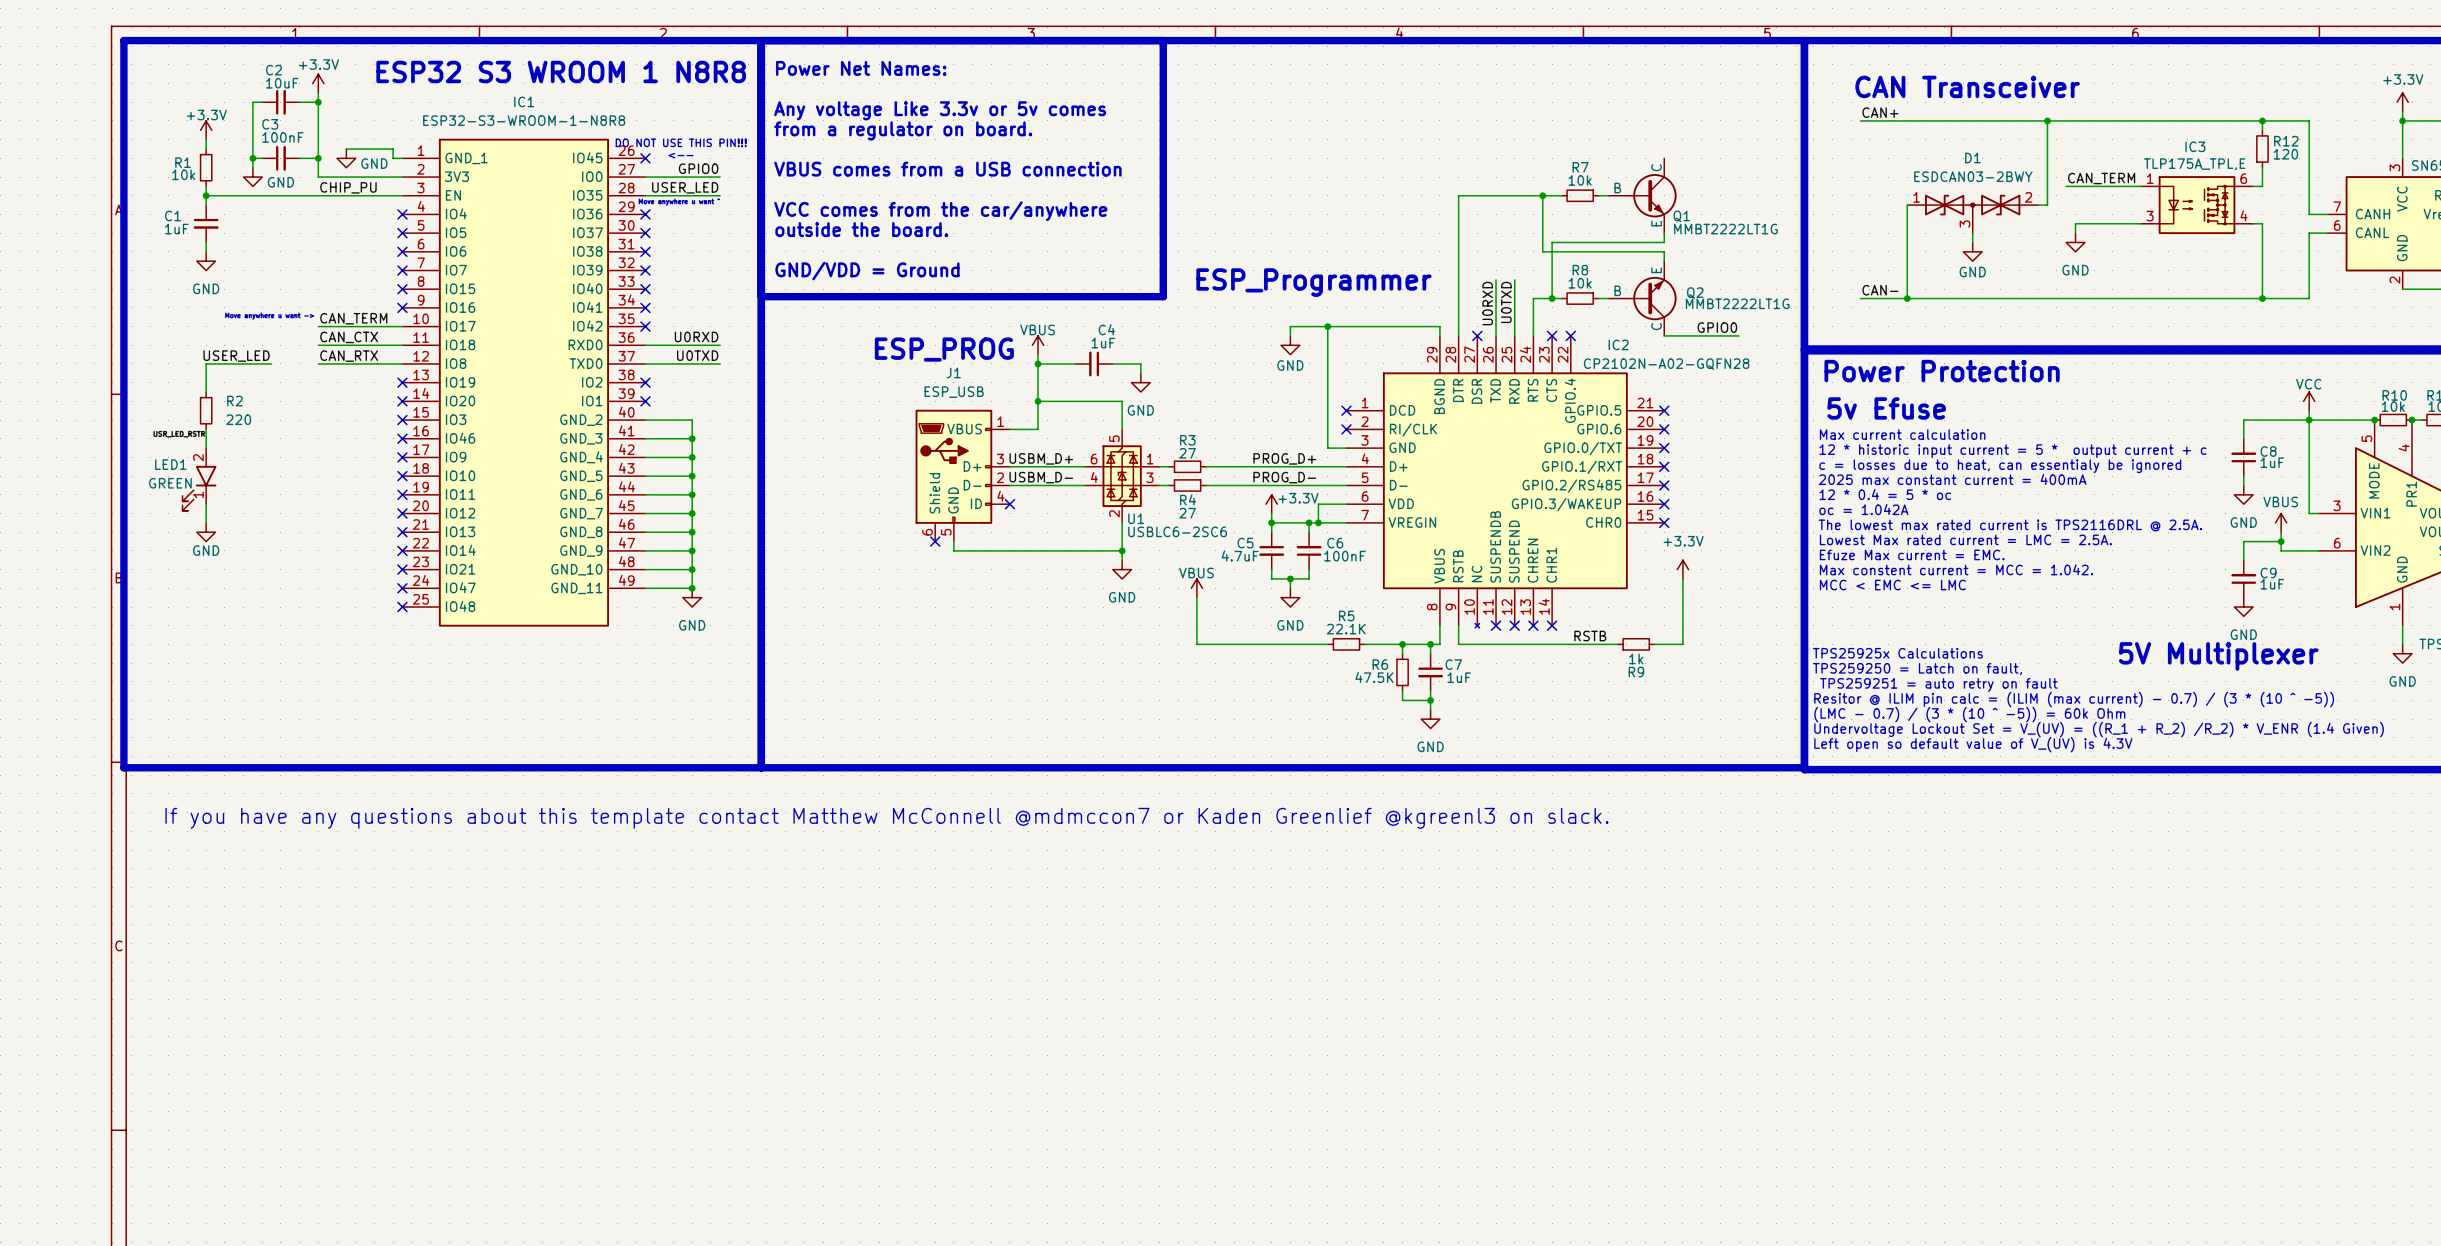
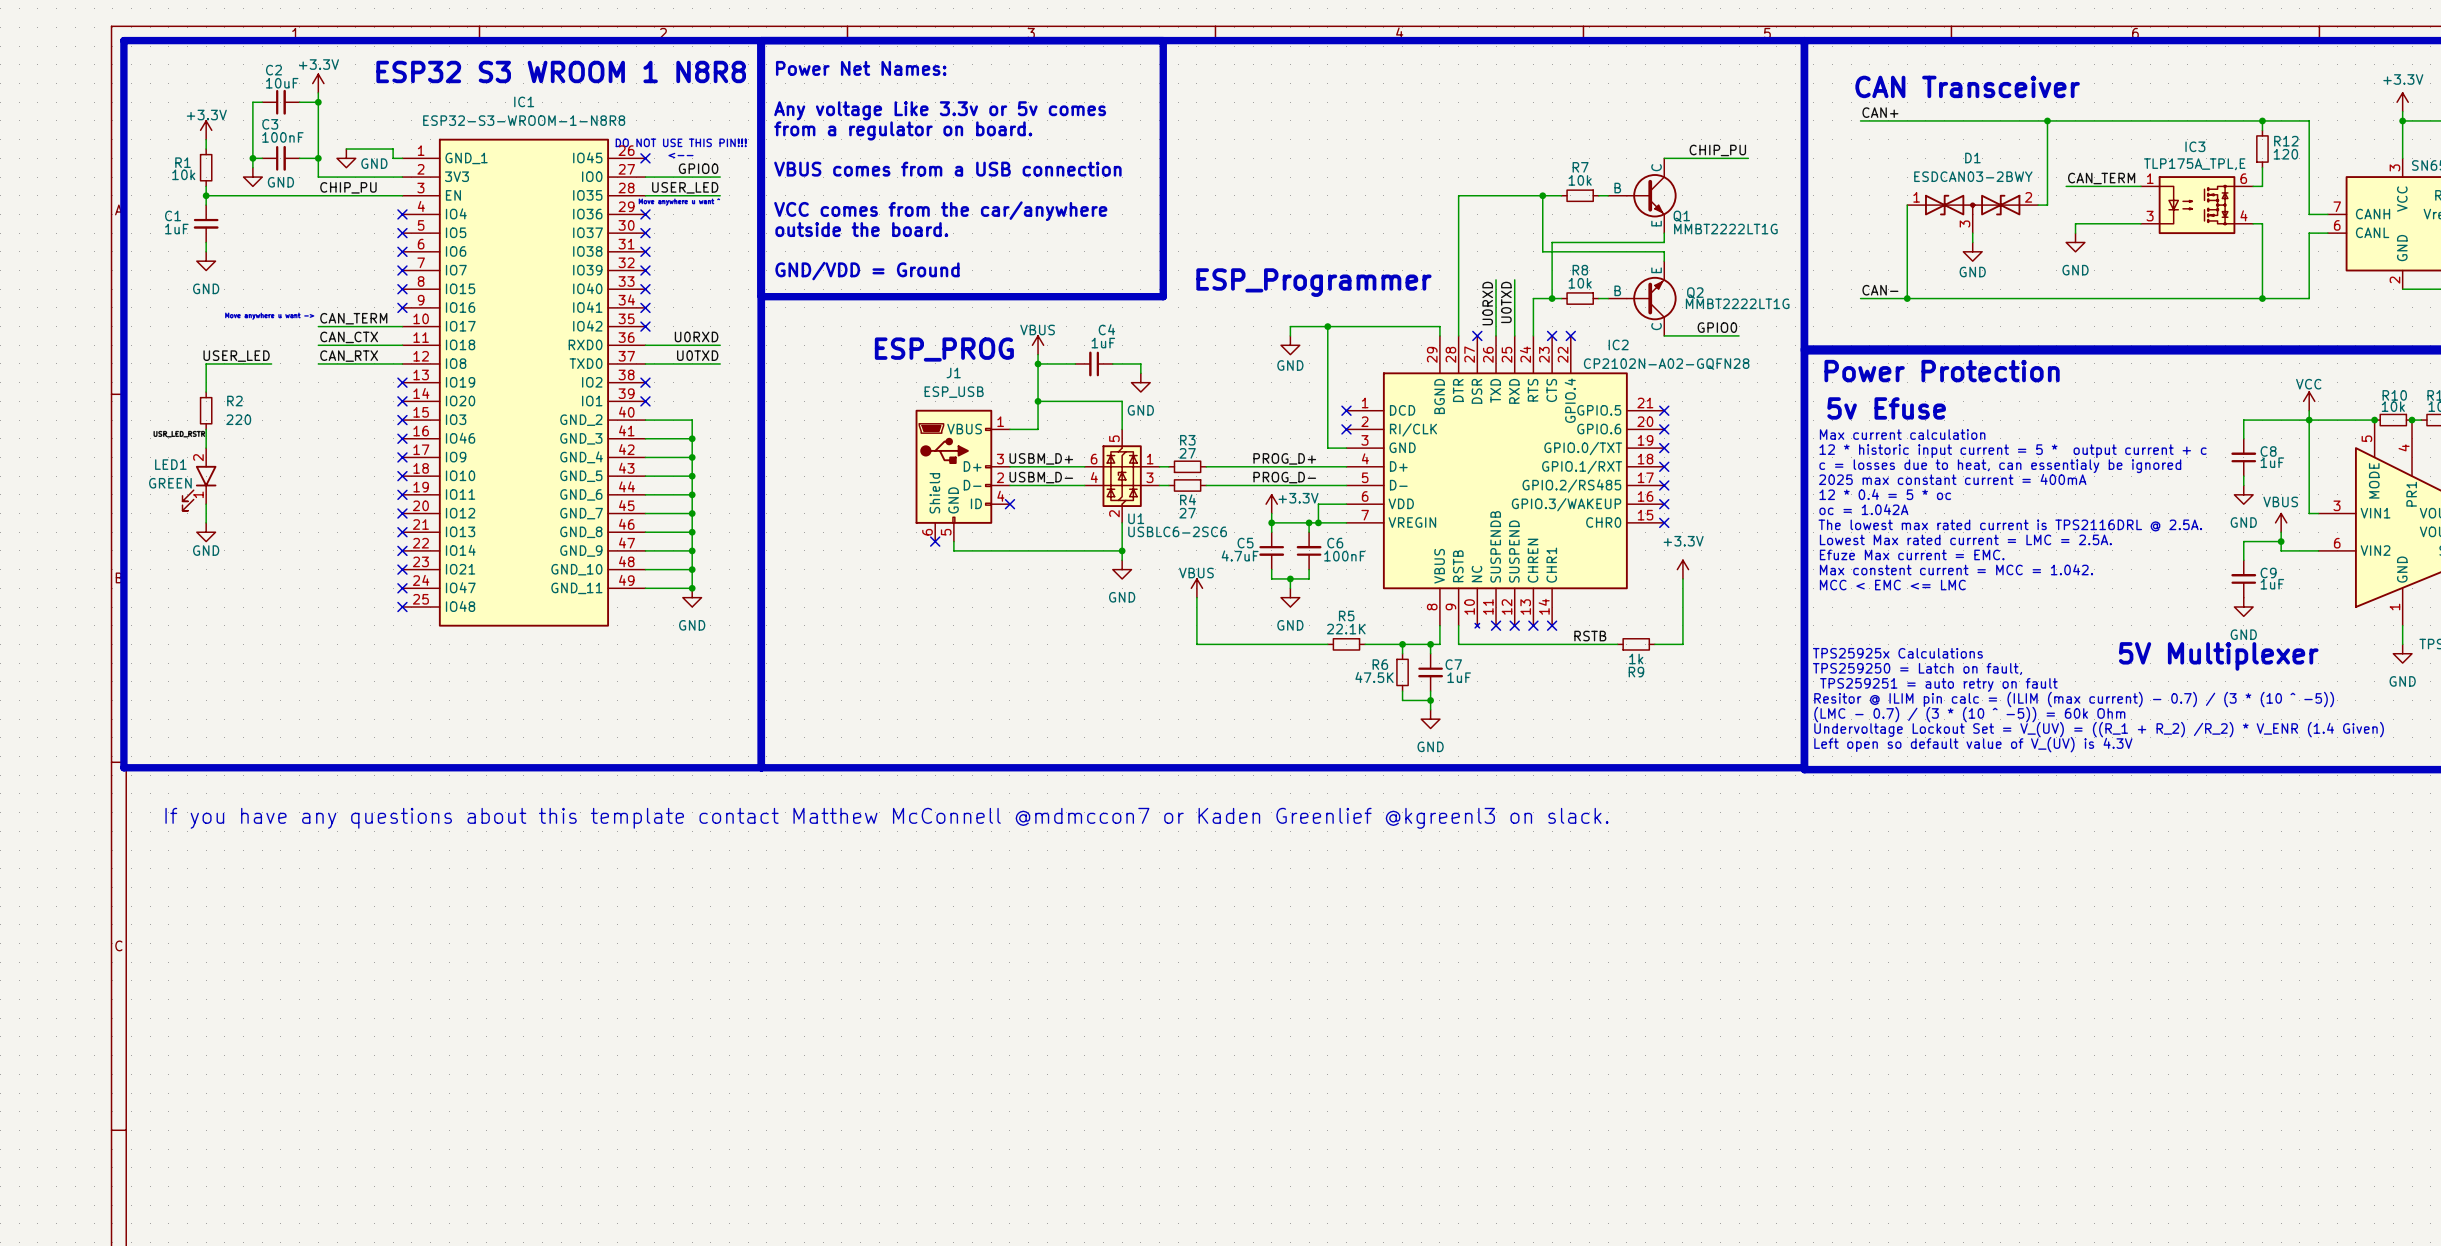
label: none -> CHIP_PU (1717, 150)
wire: none -> (1664, 158) (1748, 158)

